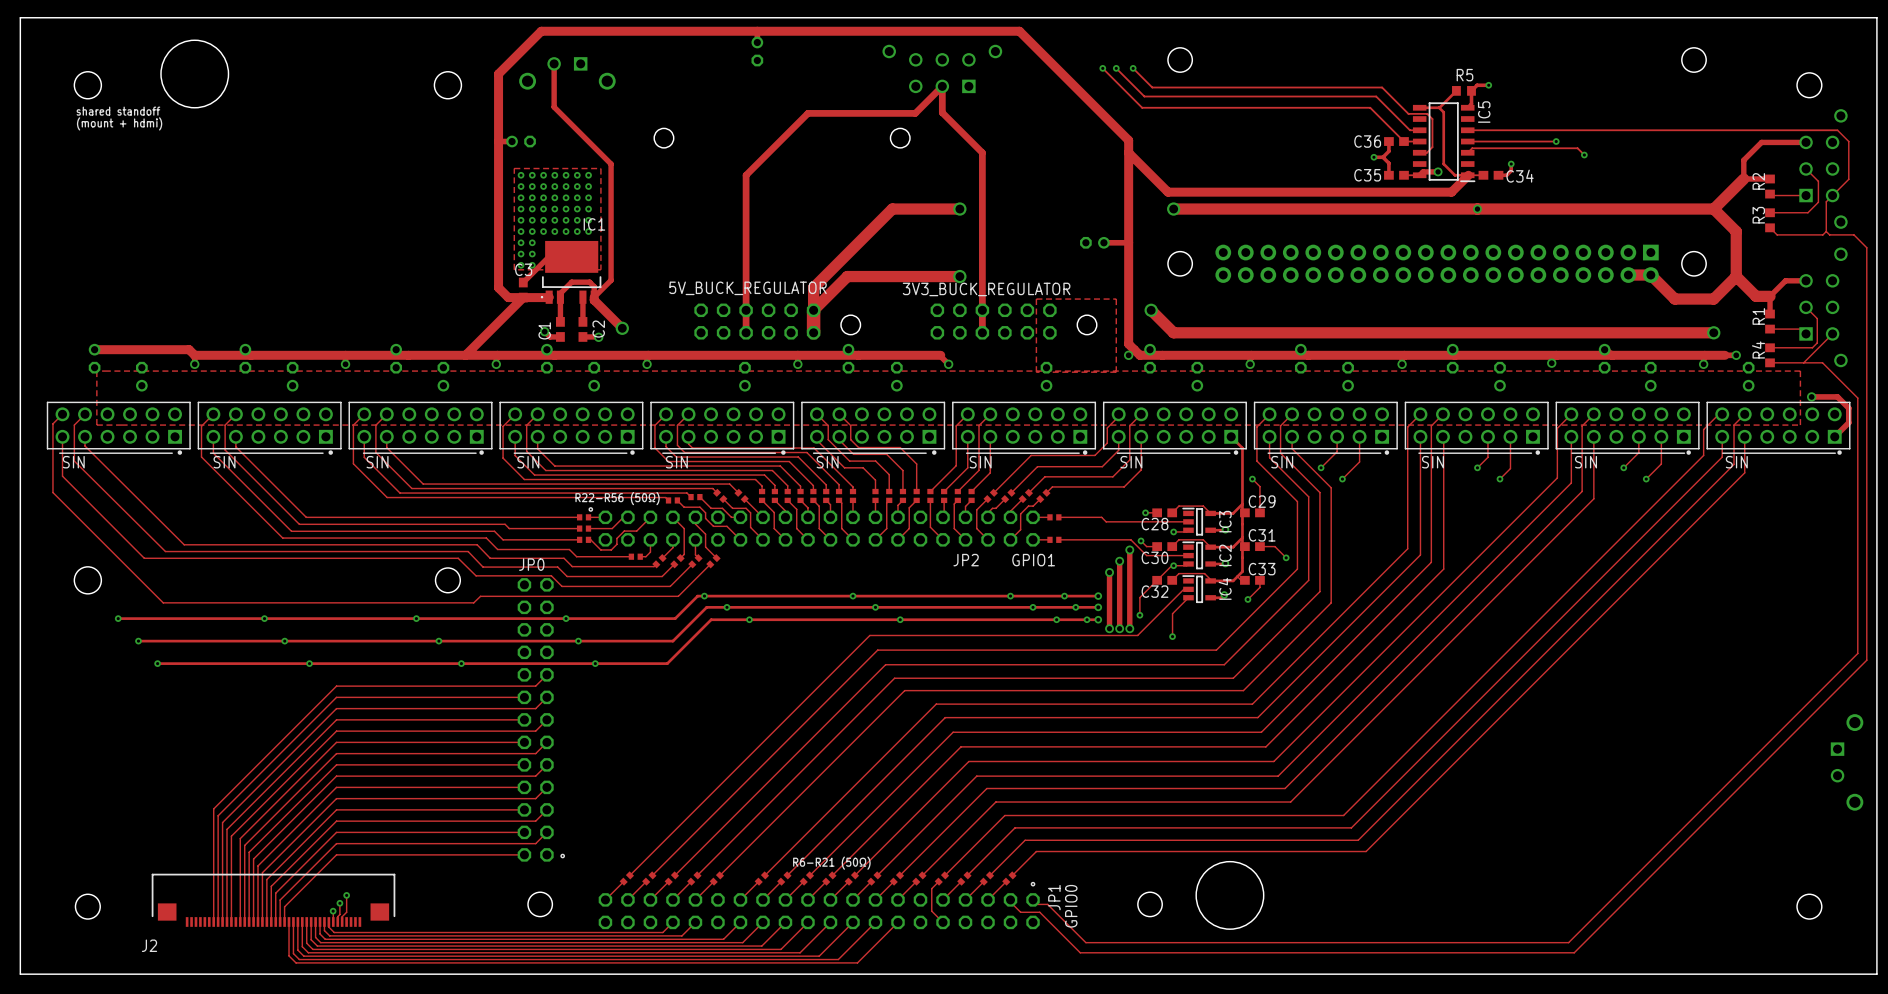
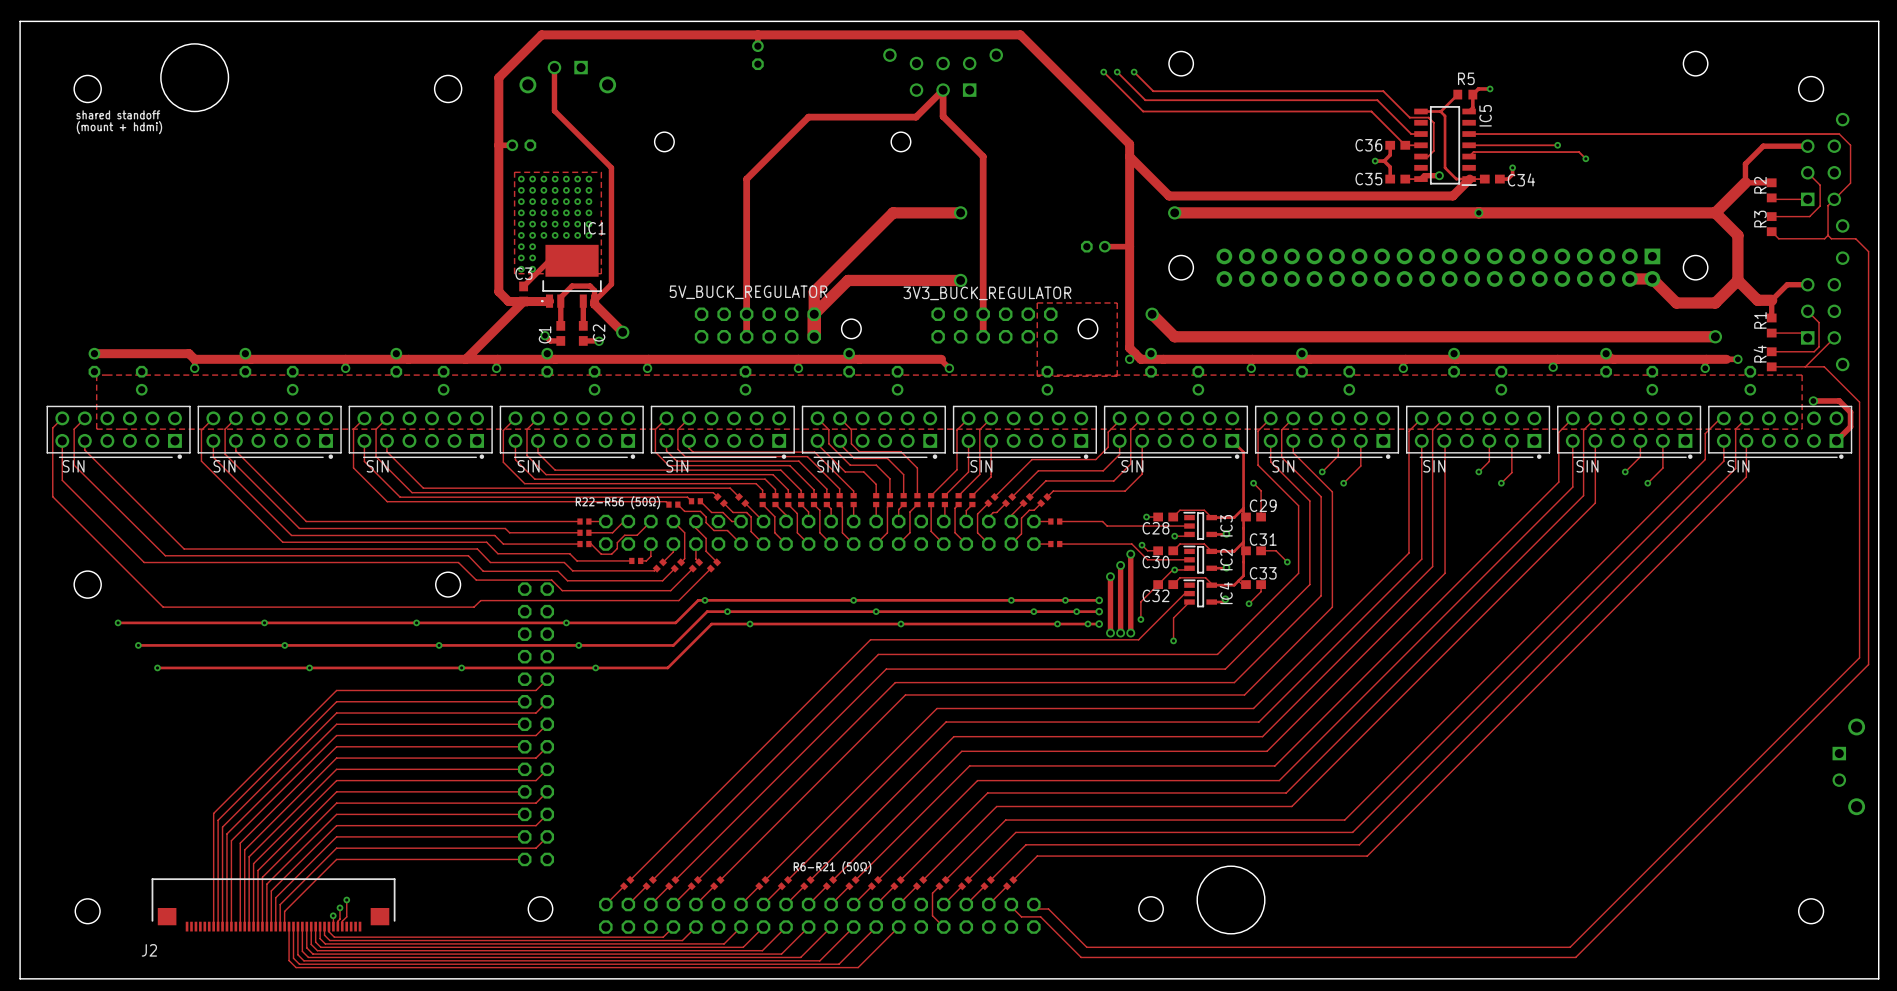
drawing: [588, 507, 594, 512] -> none
text: JP2 GPIO1 (1004, 560) -> none
text: JP0 (531, 564) -> none
drawing: [560, 853, 565, 859] -> none
drawing: [1030, 881, 1036, 887] -> none
text: JP1 (1054, 897) -> none
text: GPIO0 (1071, 906) -> none

